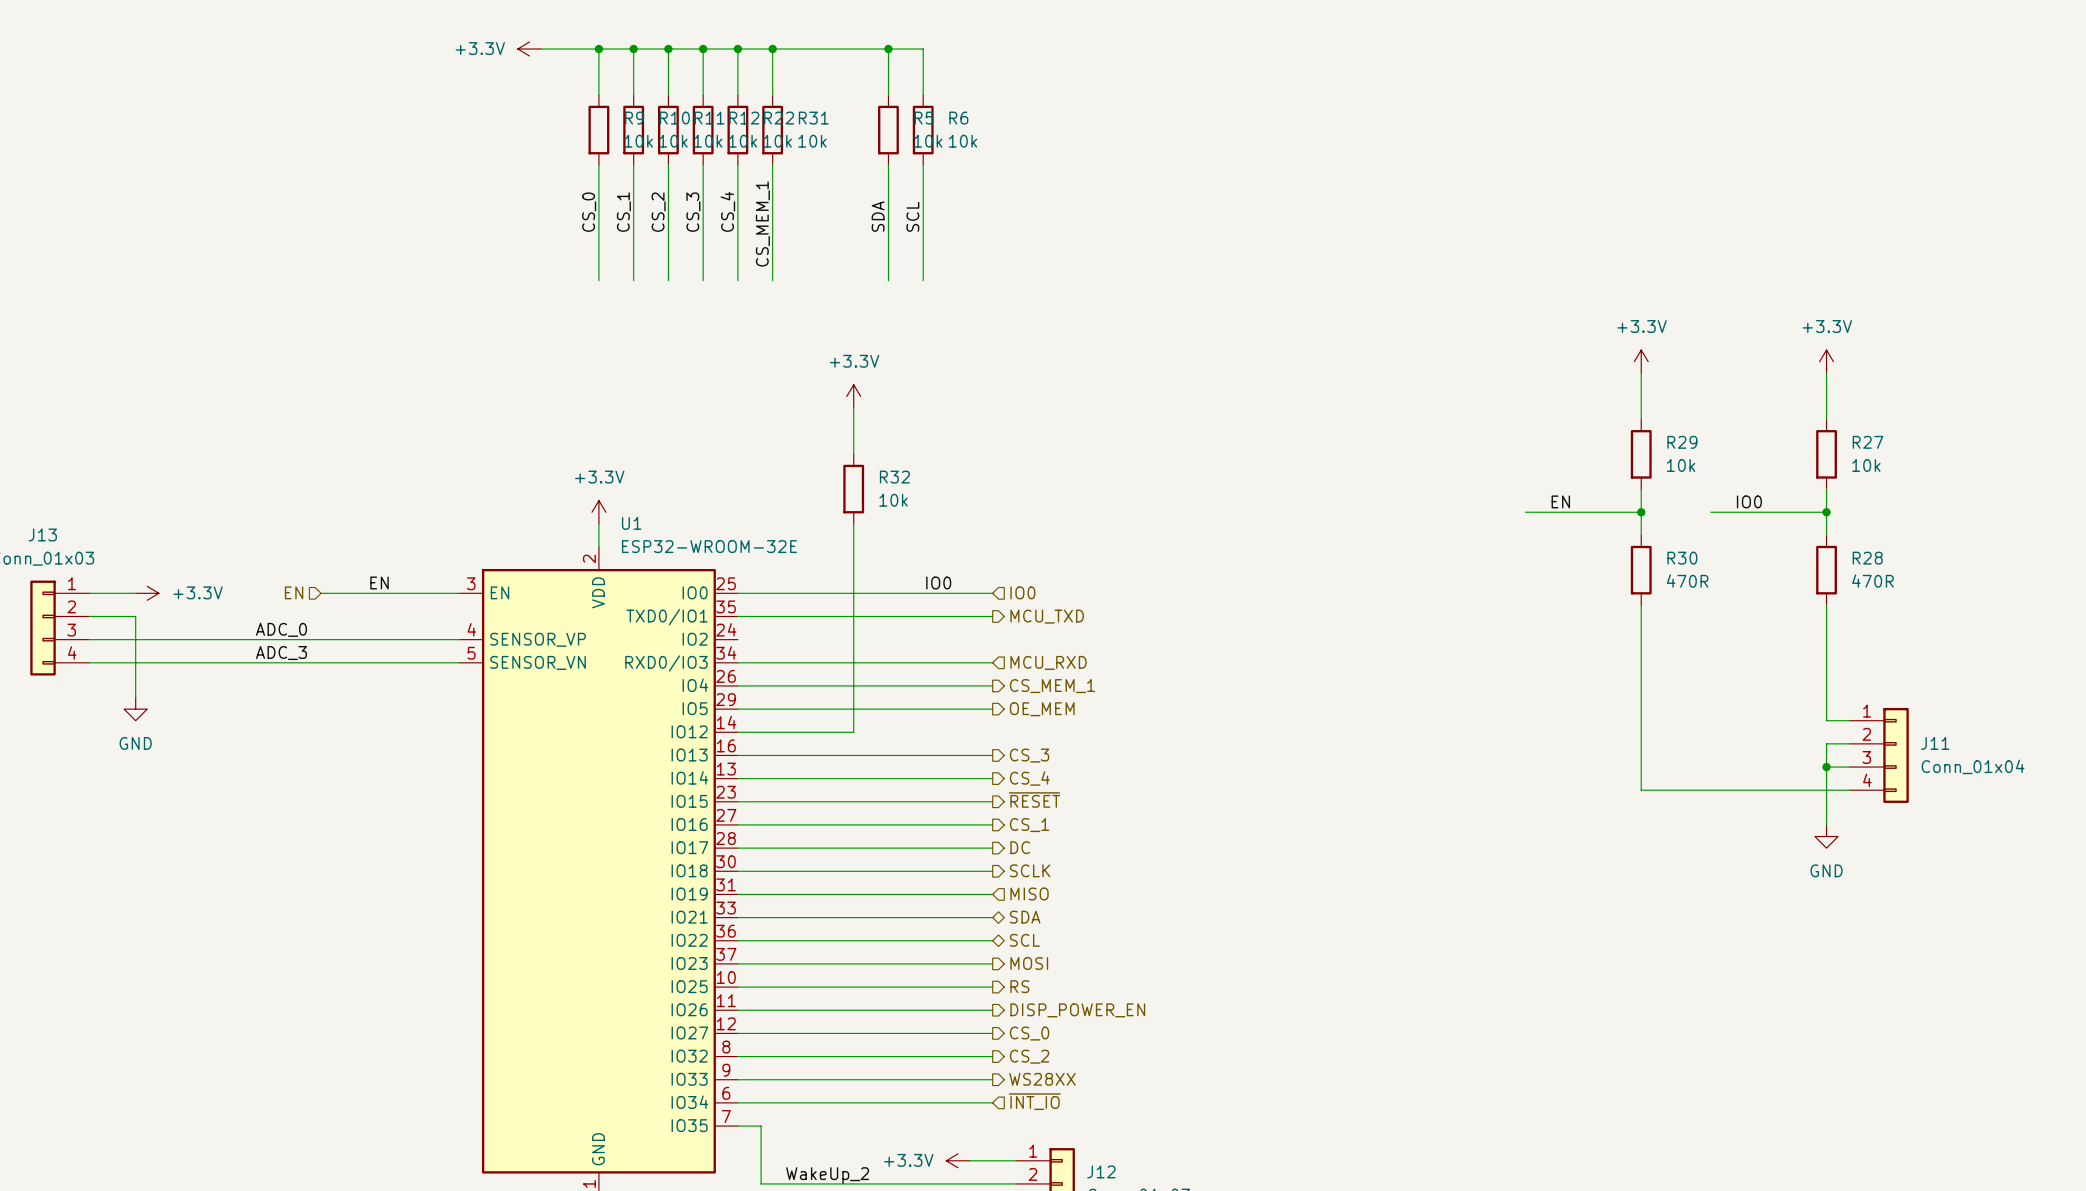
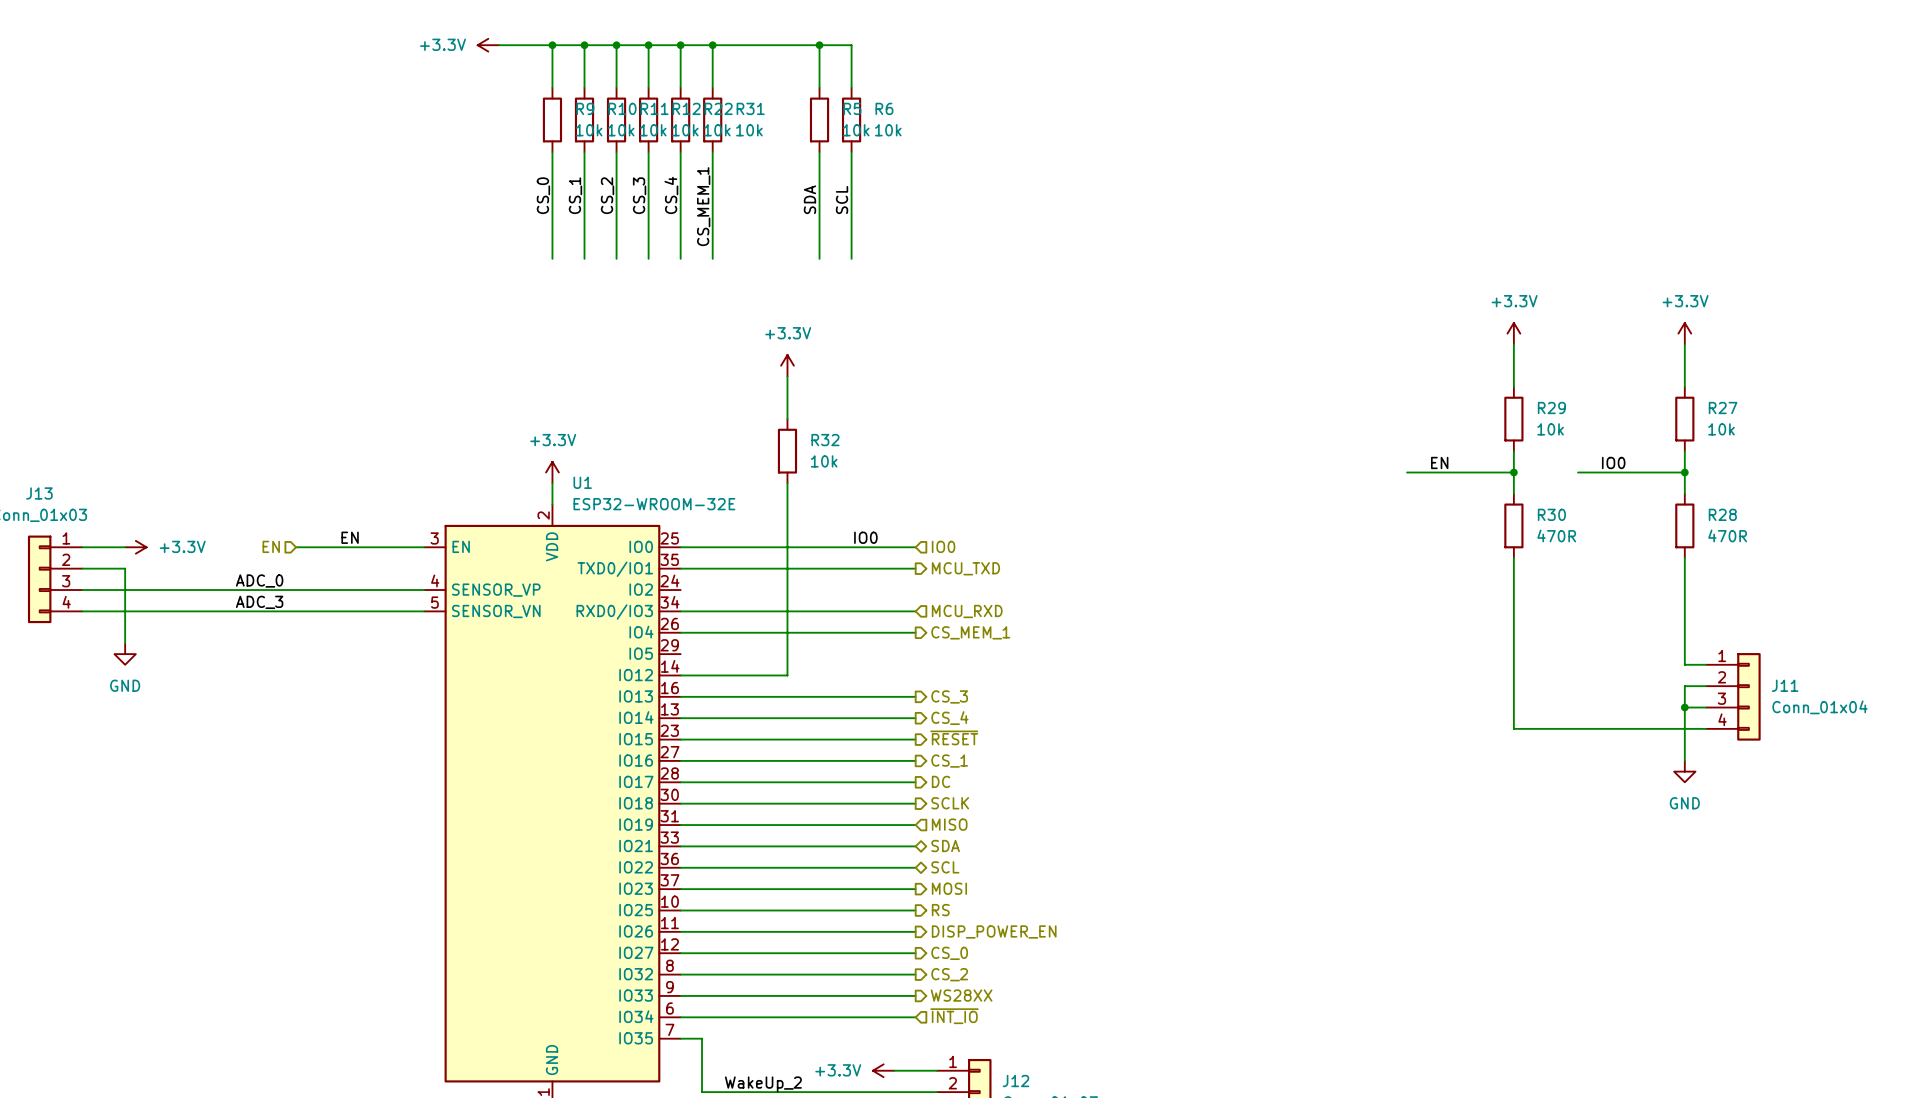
wire: (737, 709) (992, 709) -> none
hierarchical label: OE_MEM (1042, 709) -> none

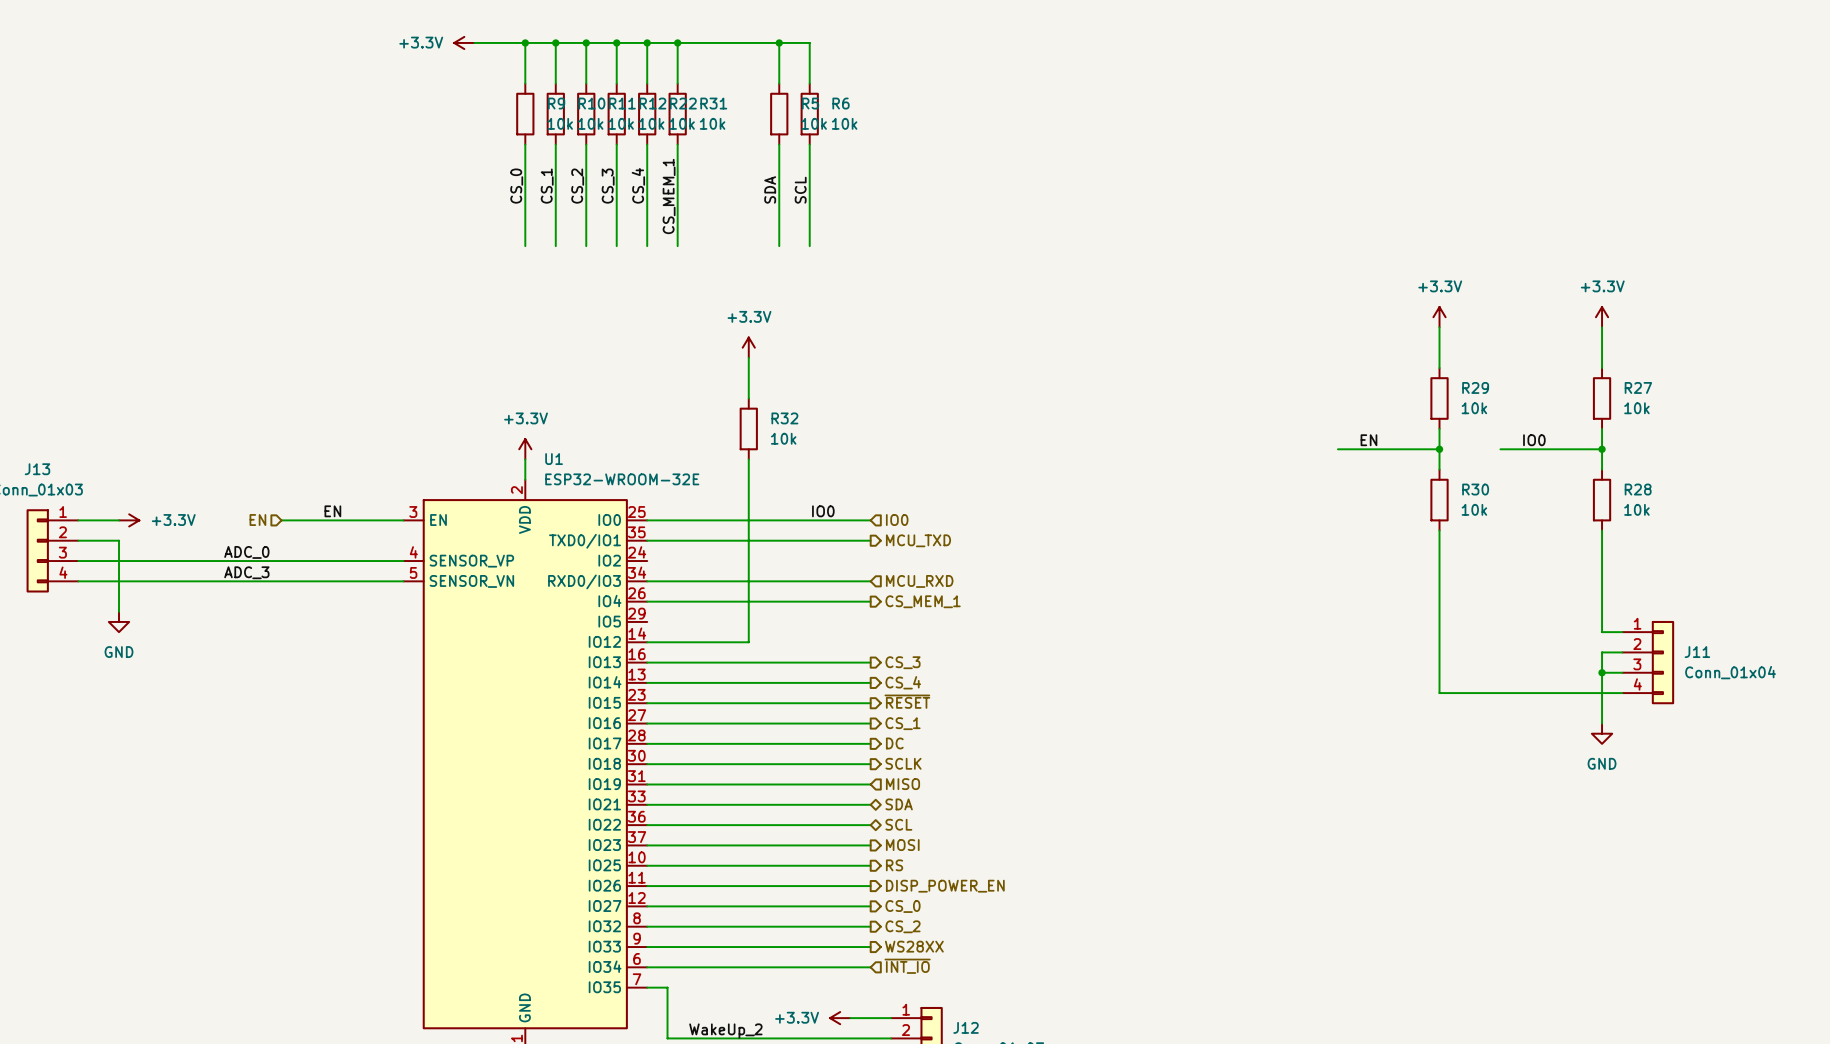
R30 value: 470R (1556, 535) -> 10k (1474, 509)
R28 value: 470R (1727, 535) -> 10k (1636, 509)

